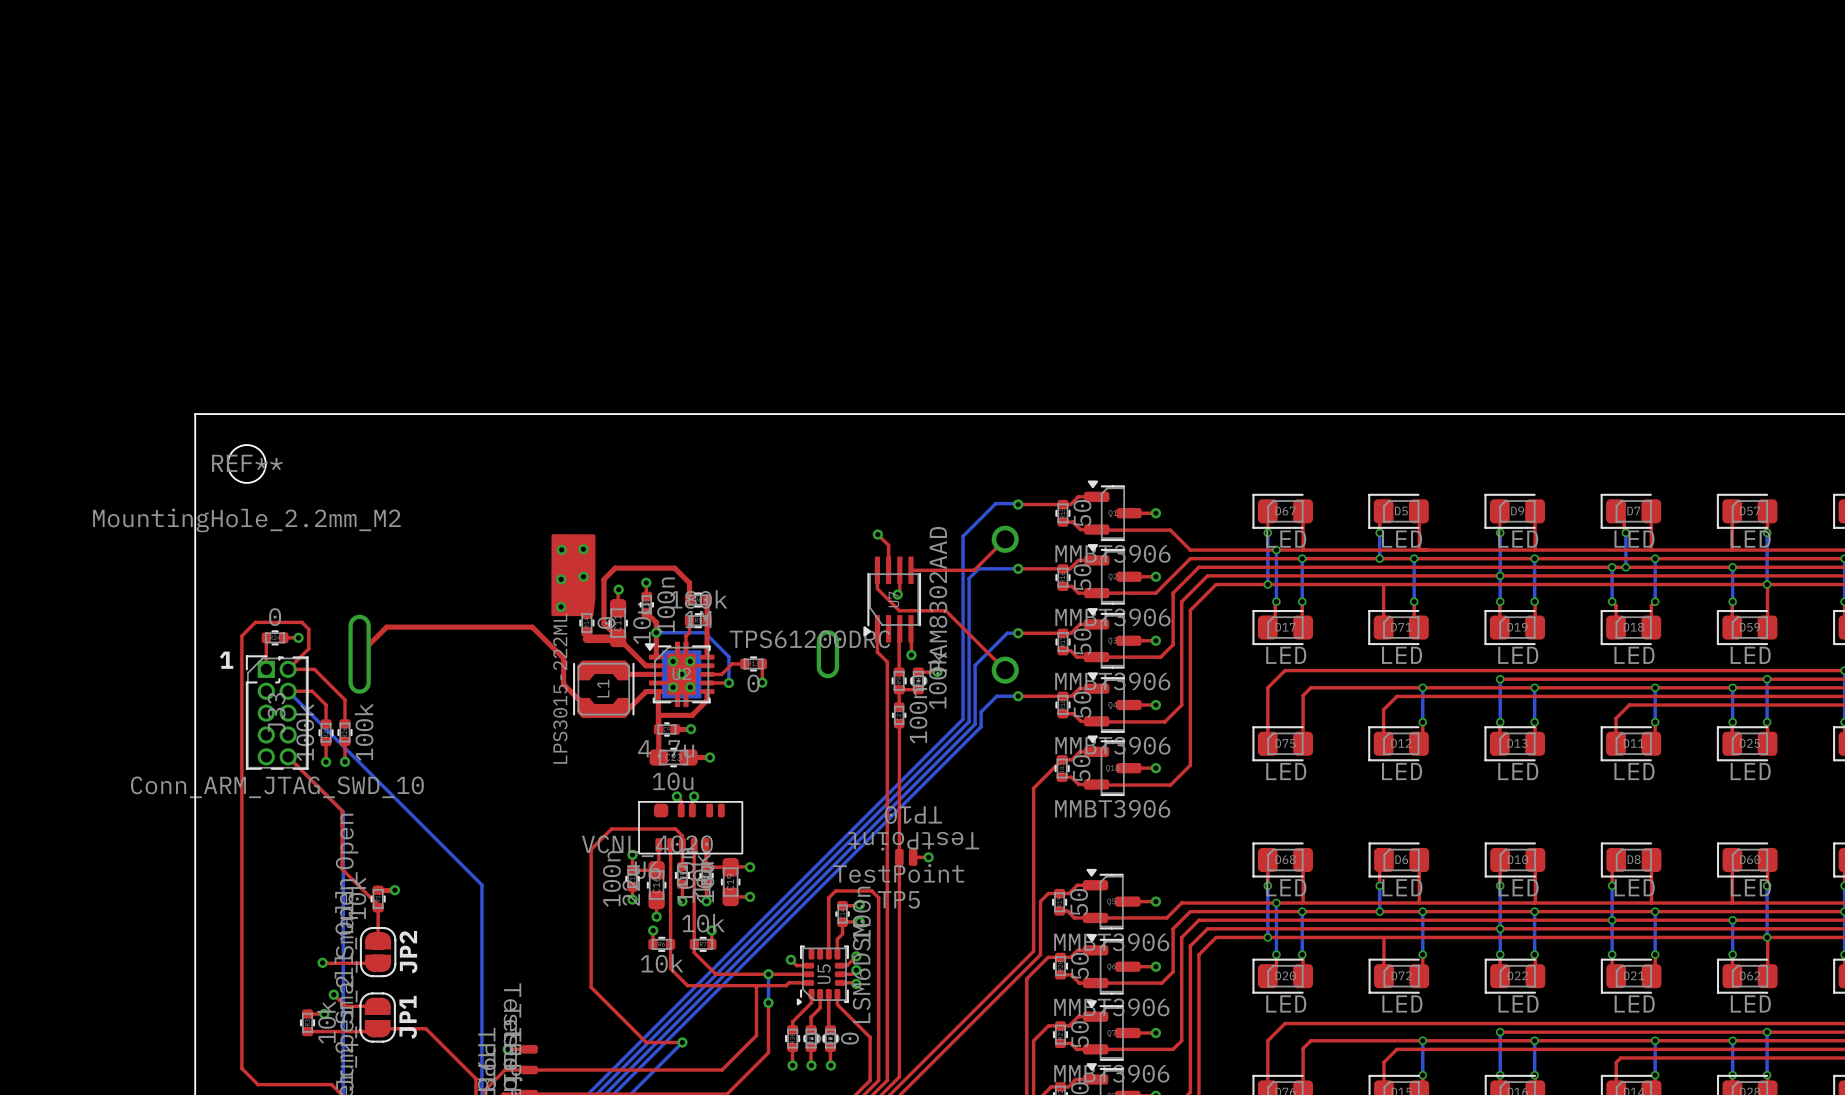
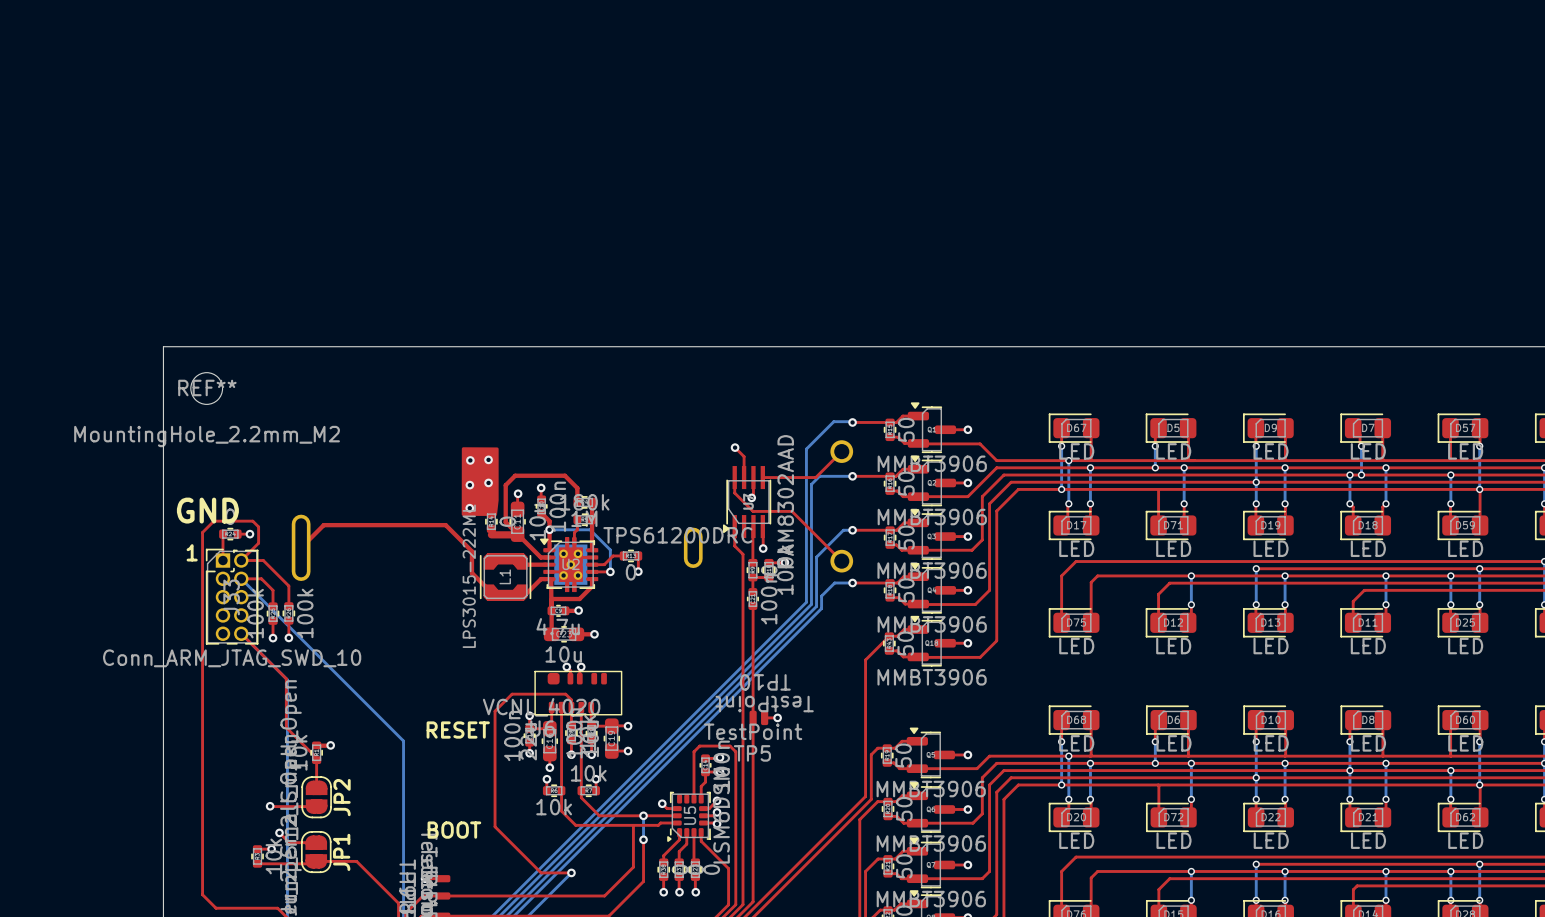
text: none -> GND (207, 510)
text: none -> RESET (458, 730)
text: none -> BOOT (454, 830)

